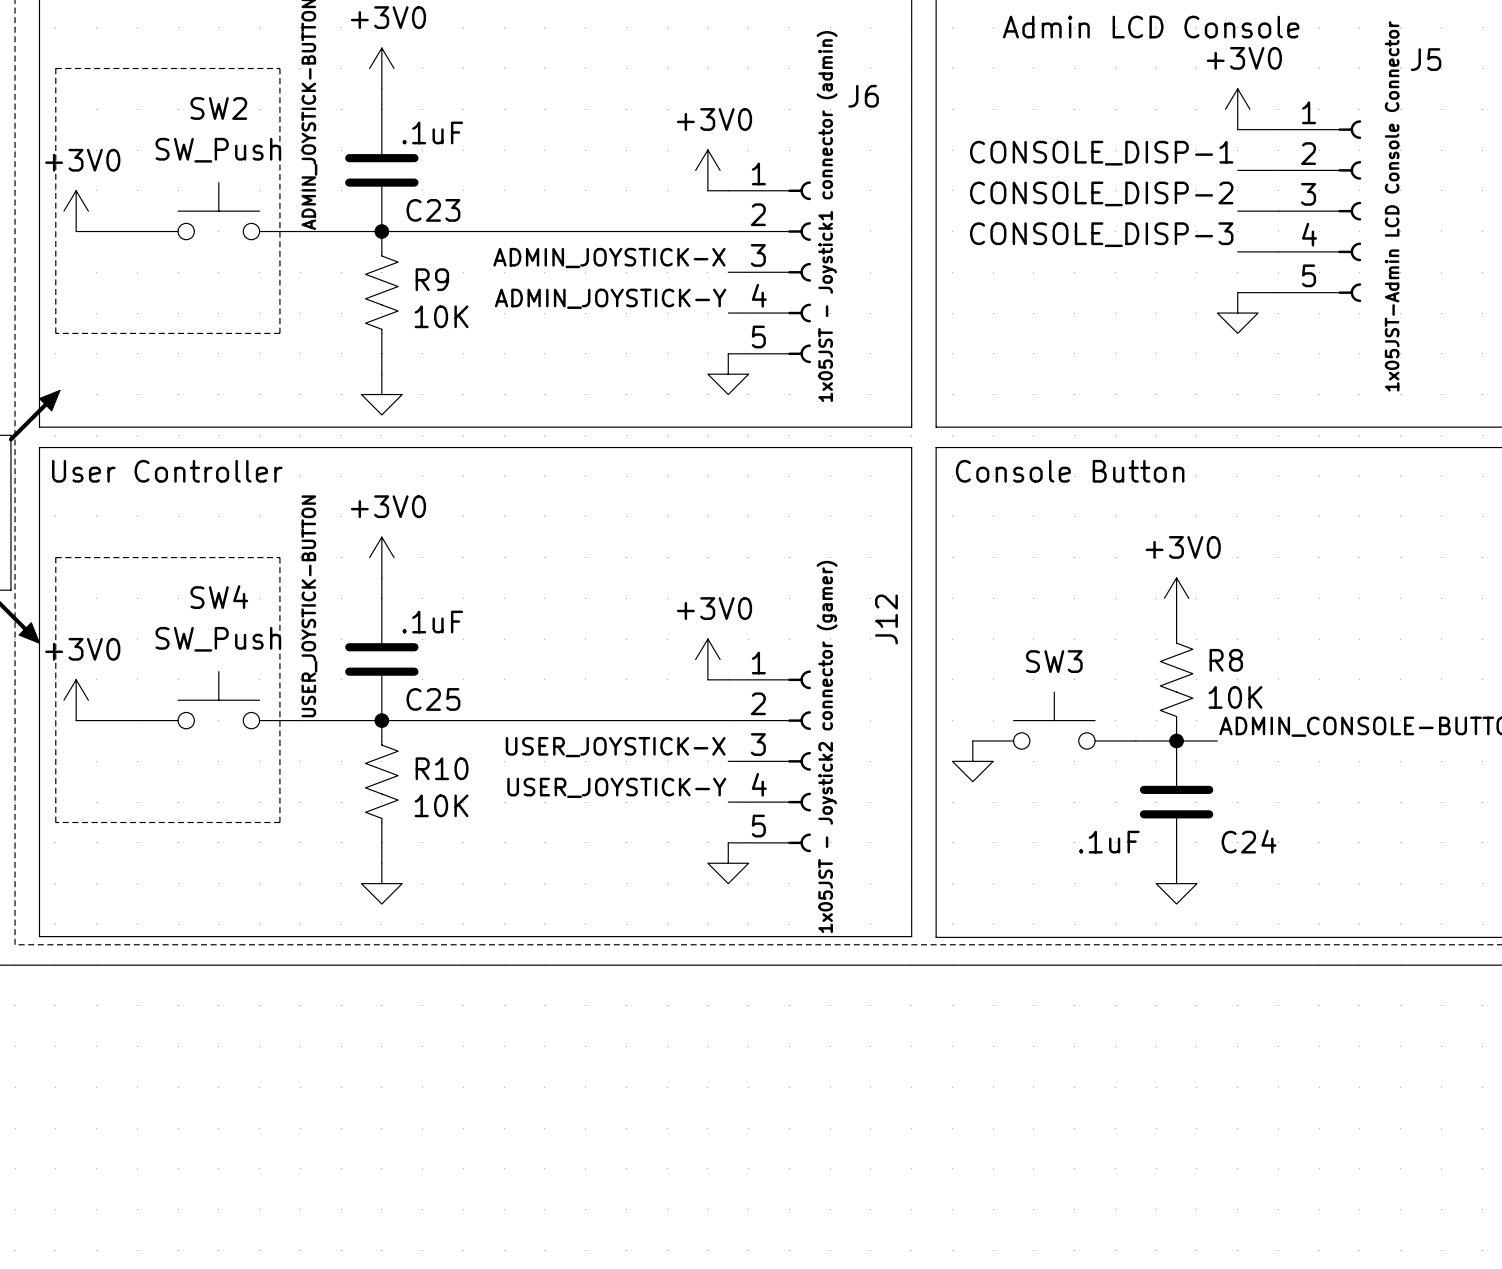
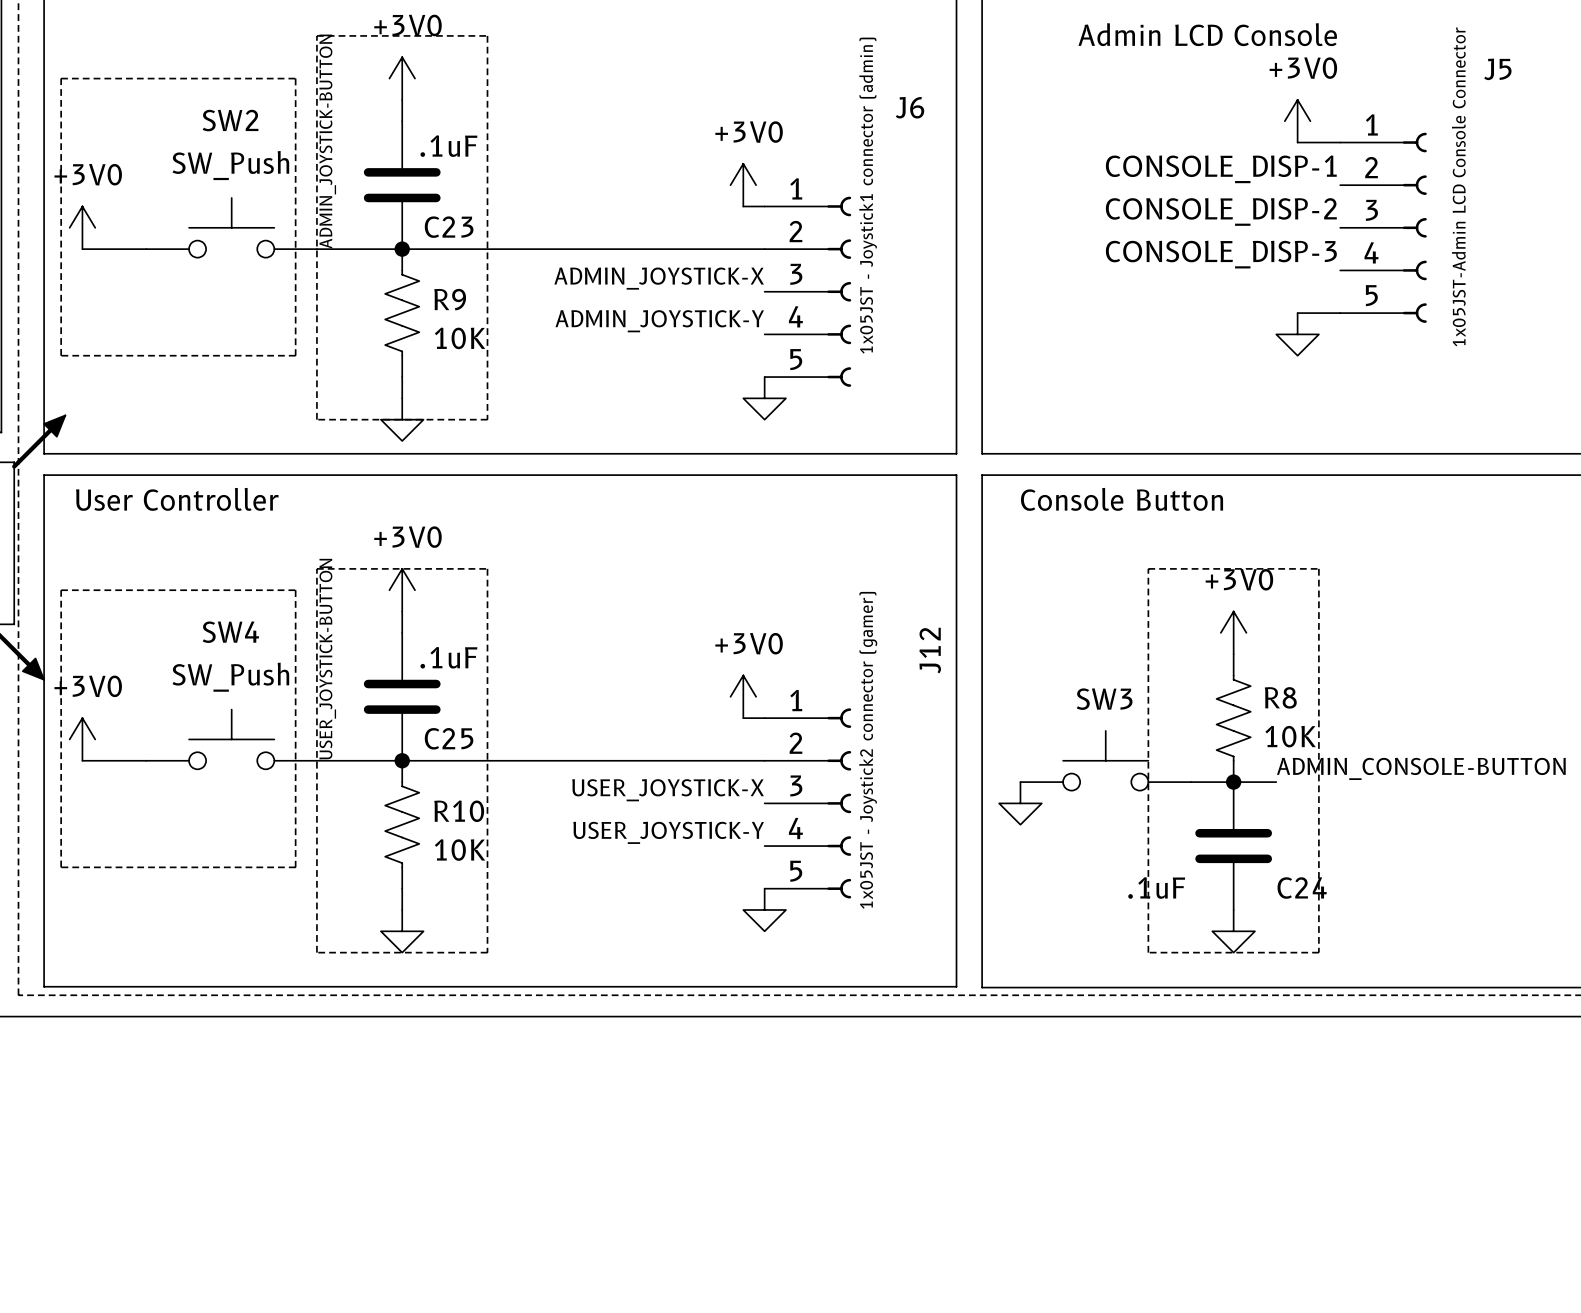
line: none -> (316, 35) (487, 35) (487, 419) (316, 419) (316, 35)
label position: CONSOLE_DISP-1 (1101, 153) -> CONSOLE_DISP-1 (1221, 169)
wire: (1237, 170) (1278, 170) -> none
label position: CONSOLE_DISP-2 (1101, 193) -> CONSOLE_DISP-2 (1221, 211)
wire: (1237, 211) (1278, 211) -> none
label position: CONSOLE_DISP-3 (1101, 234) -> CONSOLE_DISP-3 (1221, 254)
wire: (1237, 251) (1278, 251) -> none
line: none -> (316, 568) (487, 568) (487, 952) (316, 952) (316, 568)
line: none -> (1148, 568) (1318, 568) (1318, 952) (1148, 952) (1148, 568)

